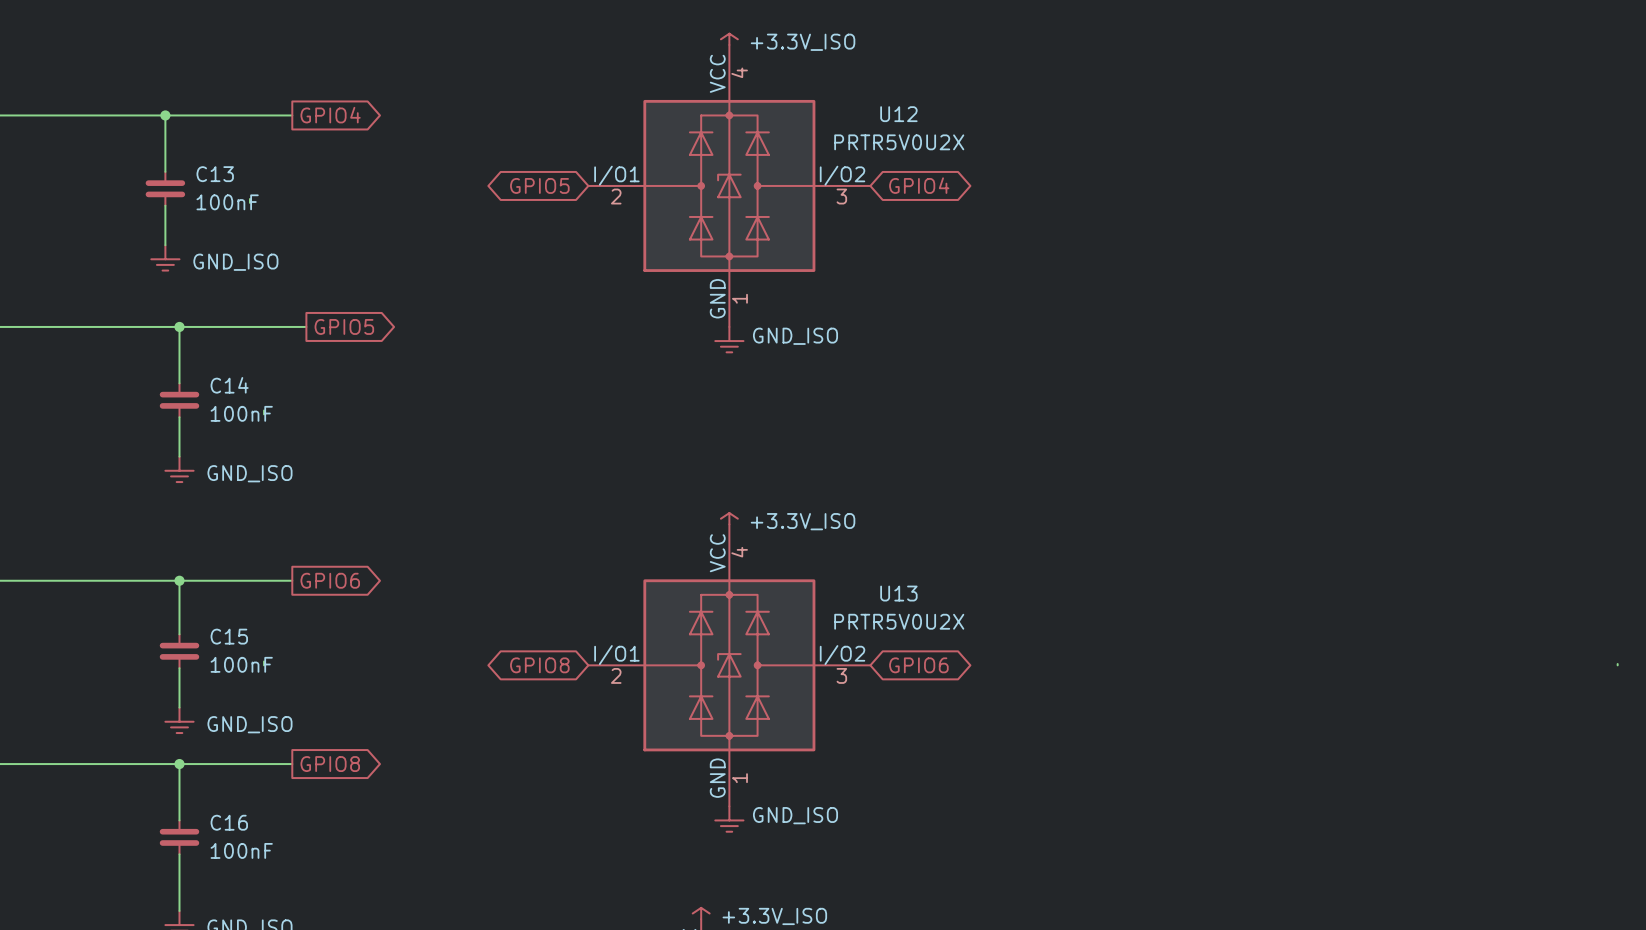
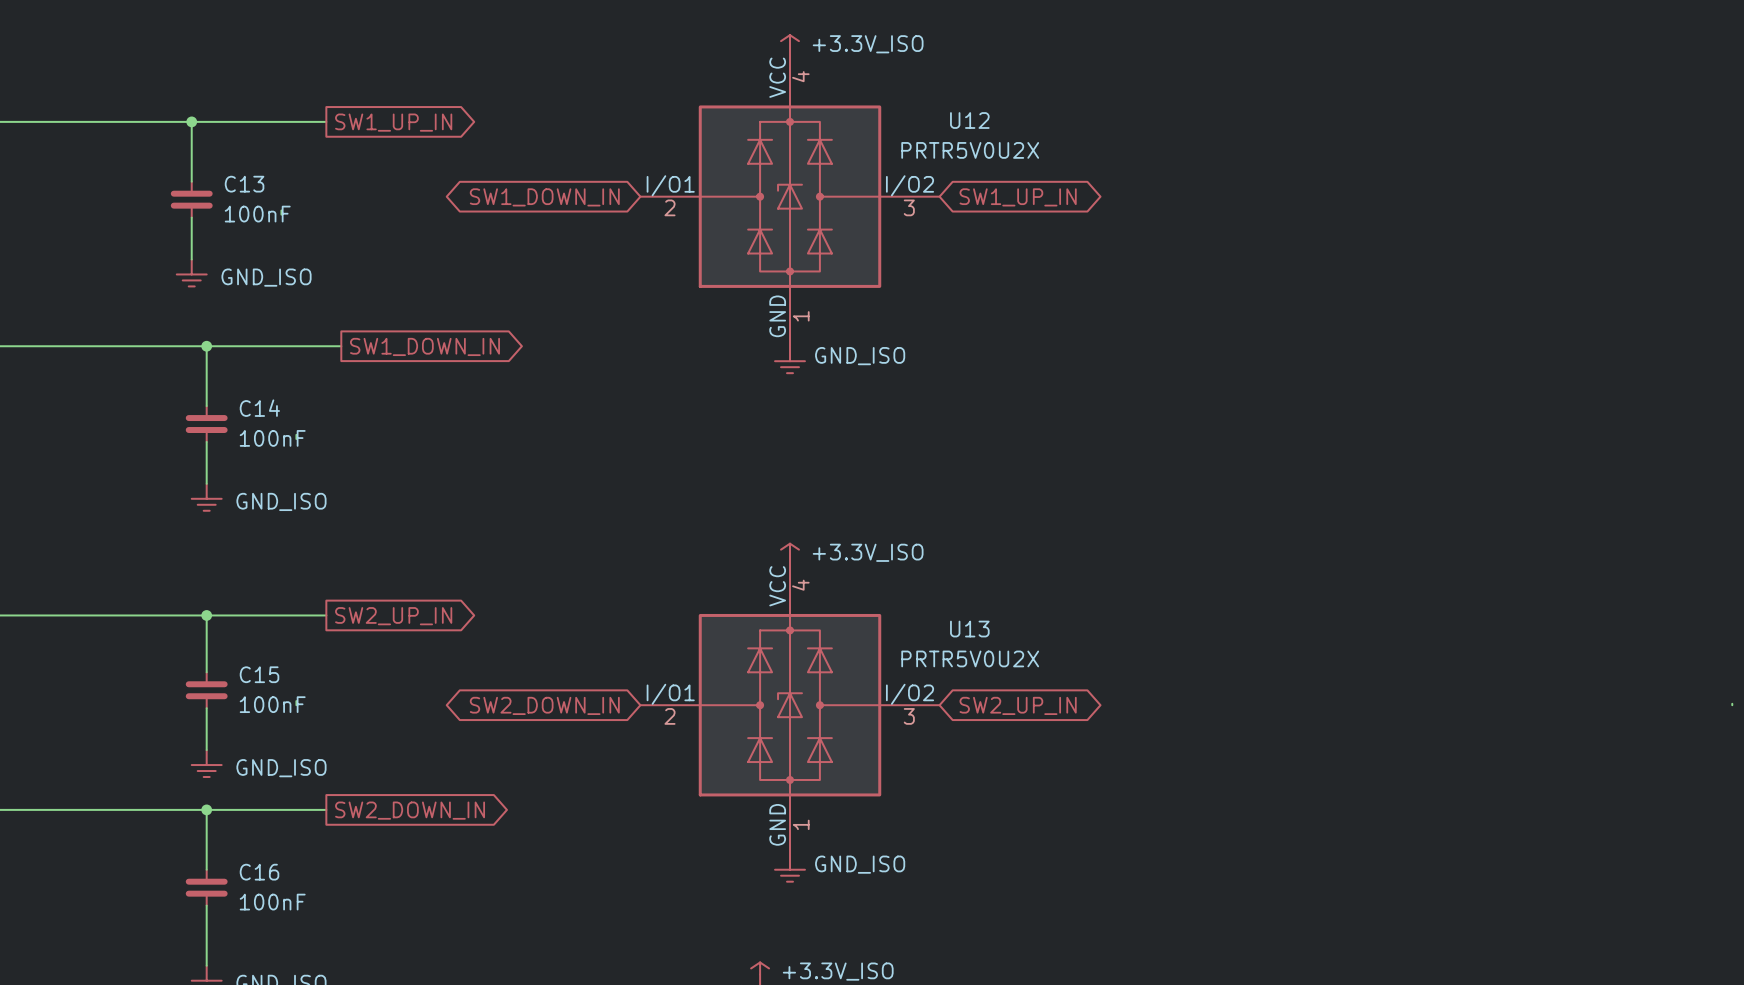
global label: GPIO4 (330, 115) -> SW1_UP_IN (393, 122)
global label: GPIO5 (539, 185) -> SW1_DOWN_IN (544, 197)
global label: GPIO4 (919, 185) -> SW1_UP_IN (1018, 197)
global label: GPIO5 (344, 326) -> SW1_DOWN_IN (425, 346)
global label: GPIO6 (330, 580) -> SW2_UP_IN (393, 616)
global label: GPIO8 (539, 665) -> SW2_DOWN_IN (544, 705)
global label: GPIO6 (918, 665) -> SW2_UP_IN (1018, 705)
global label: GPIO8 (330, 764) -> SW2_DOWN_IN (410, 810)

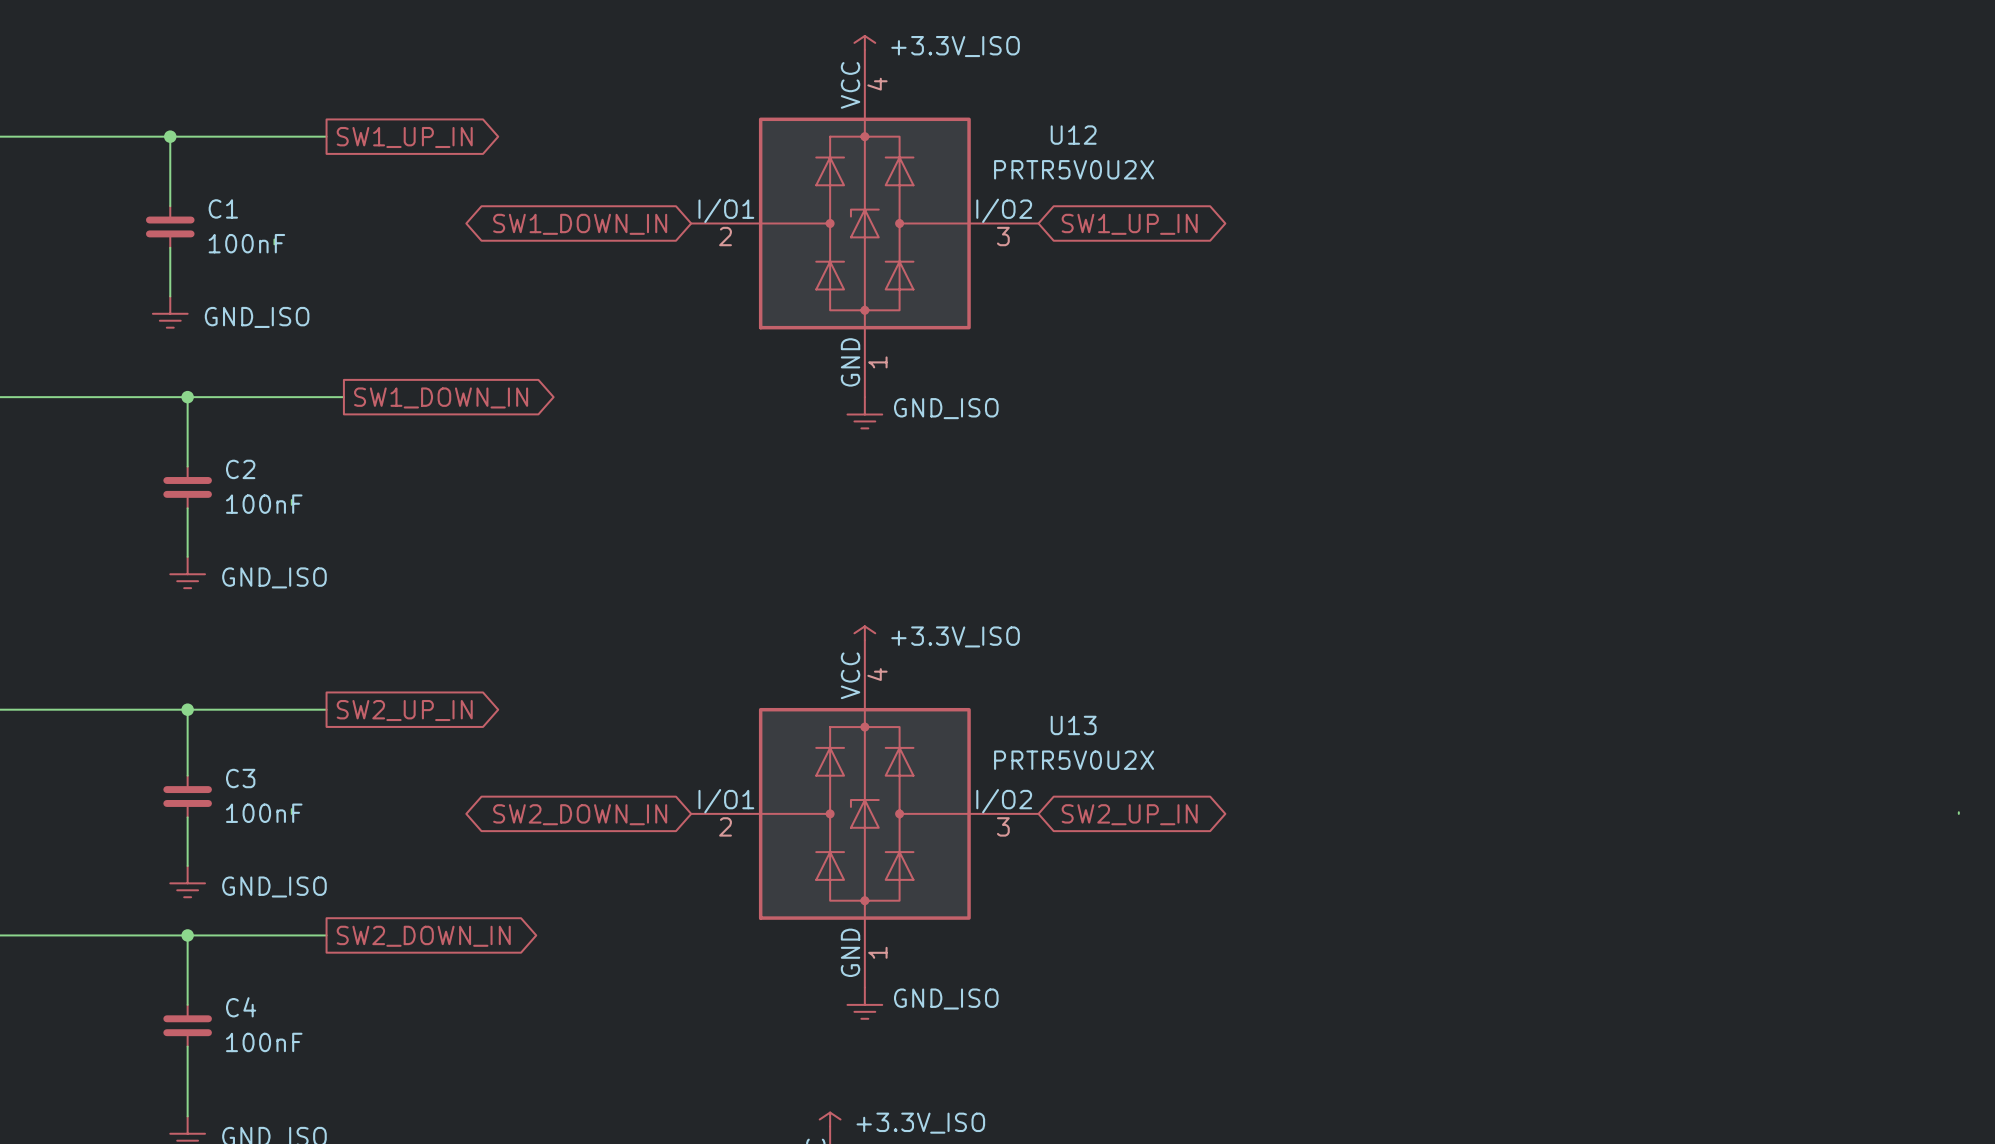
C13 name: C13 (244, 184) -> C1 (223, 208)
C14 name: C14 (259, 408) -> C2 (240, 469)
C15 name: C15 (259, 674) -> C3 (240, 778)
C16 name: C16 (259, 872) -> C4 (241, 1007)

